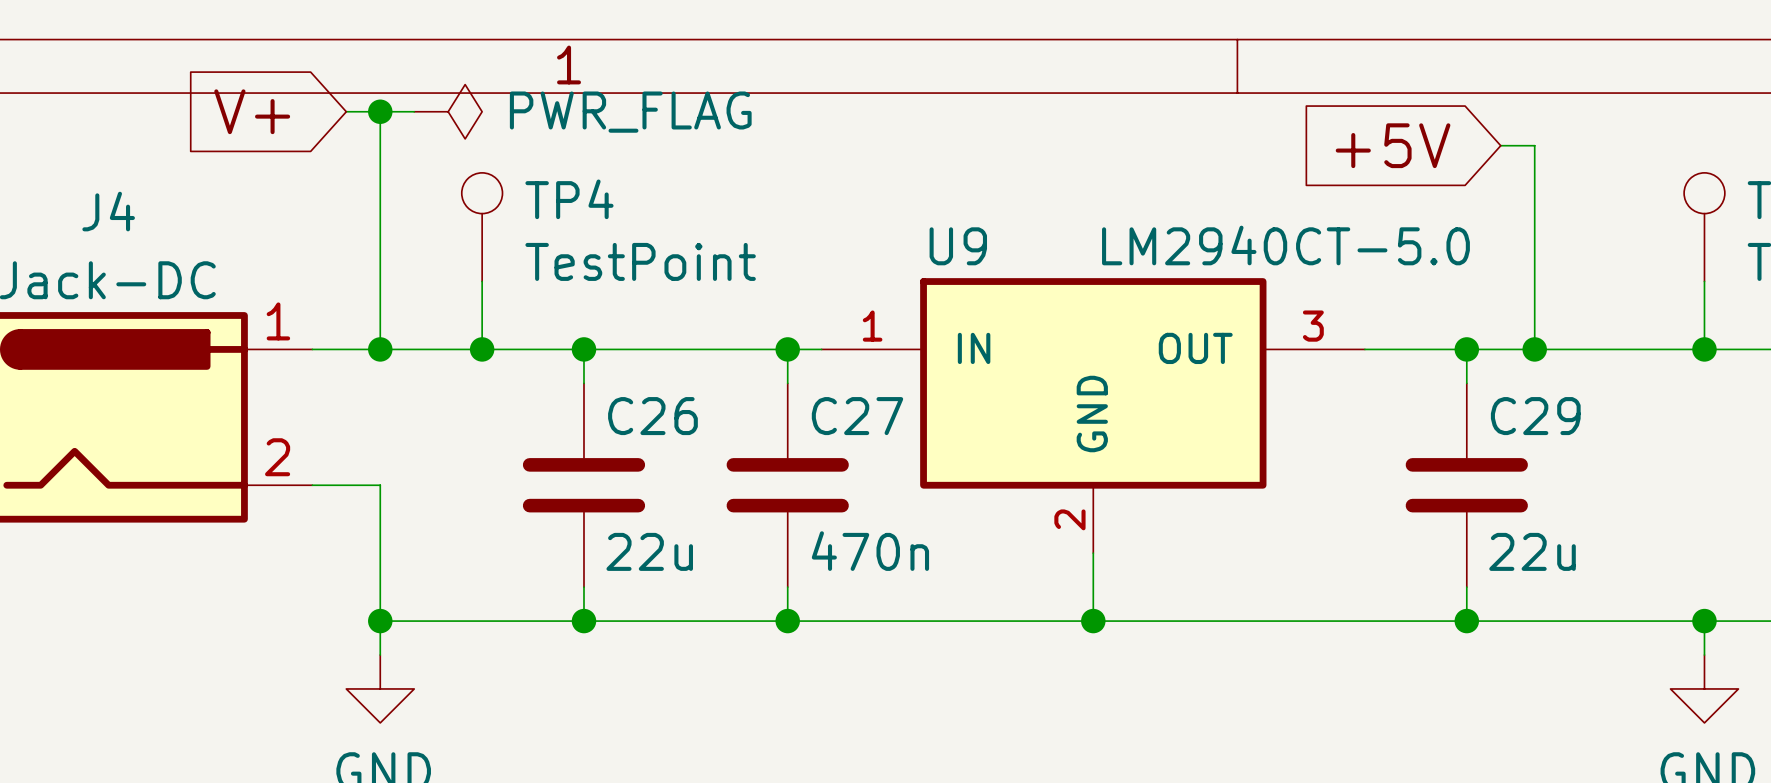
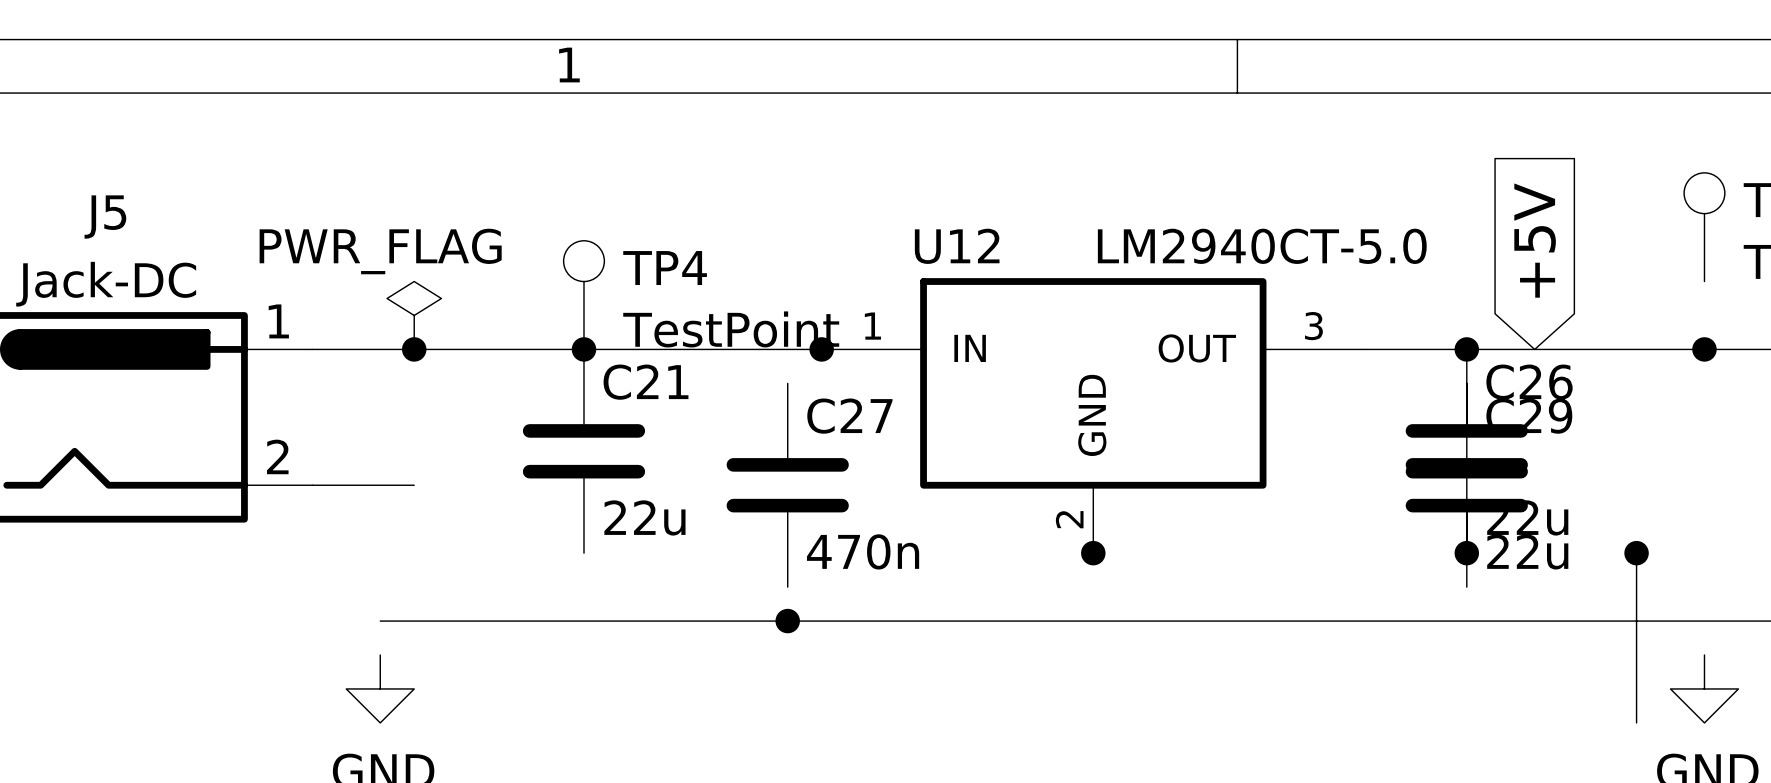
global label: V+ (252, 111) -> none
wire: (346, 111) (414, 111) -> none
wire: (380, 111) (380, 349) -> none
junction: (380, 111) -> none
power symbol rotation: 0° (448, 111) -> 90° counterclockwise (414, 315)
power symbol position: PWR_FLAG (448, 111) -> PWR_FLAG (414, 315)
power symbol text position: PWR_FLAG (630, 112) -> PWR_FLAG (380, 251)
global label rotation: 0° (1393, 145) -> 90° clockwise (1535, 240)
wire: (1500, 145) (1534, 145) (1534, 349) -> none
J4 name: J4 (108, 211) -> J5 (105, 217)
TP4 position: (482, 227) -> (583, 295)
U9 name: U9 (958, 246) -> U12 (957, 246)
wire: (482, 281) (482, 349) -> none
wire: (1704, 281) (1704, 349) -> none
junction: (380, 349) -> none
junction: none -> (414, 349)
junction: (482, 349) -> none
wire: (787, 349) (787, 383) -> none
junction position: (787, 349) -> (821, 349)
junction: (1534, 349) -> none
C21: none -> 22u (583, 451)
wire: (380, 485) (380, 655) -> (380, 485) (414, 485)
C26 position: (583, 485) -> (1466, 451)
wire: (1093, 553) (1093, 621) -> none
wire: none -> (1636, 553) (1636, 722)
junction: none -> (1636, 553)
wire: (583, 587) (583, 621) -> none
wire: (787, 587) (787, 621) -> none
wire: (1466, 587) (1466, 621) -> none
junction: (380, 621) -> none
junction: (583, 621) -> none
junction position: (1093, 621) -> (1093, 553)
junction position: (1466, 621) -> (1466, 553)
wire: (1704, 621) (1704, 655) -> none
junction: (1704, 621) -> none

